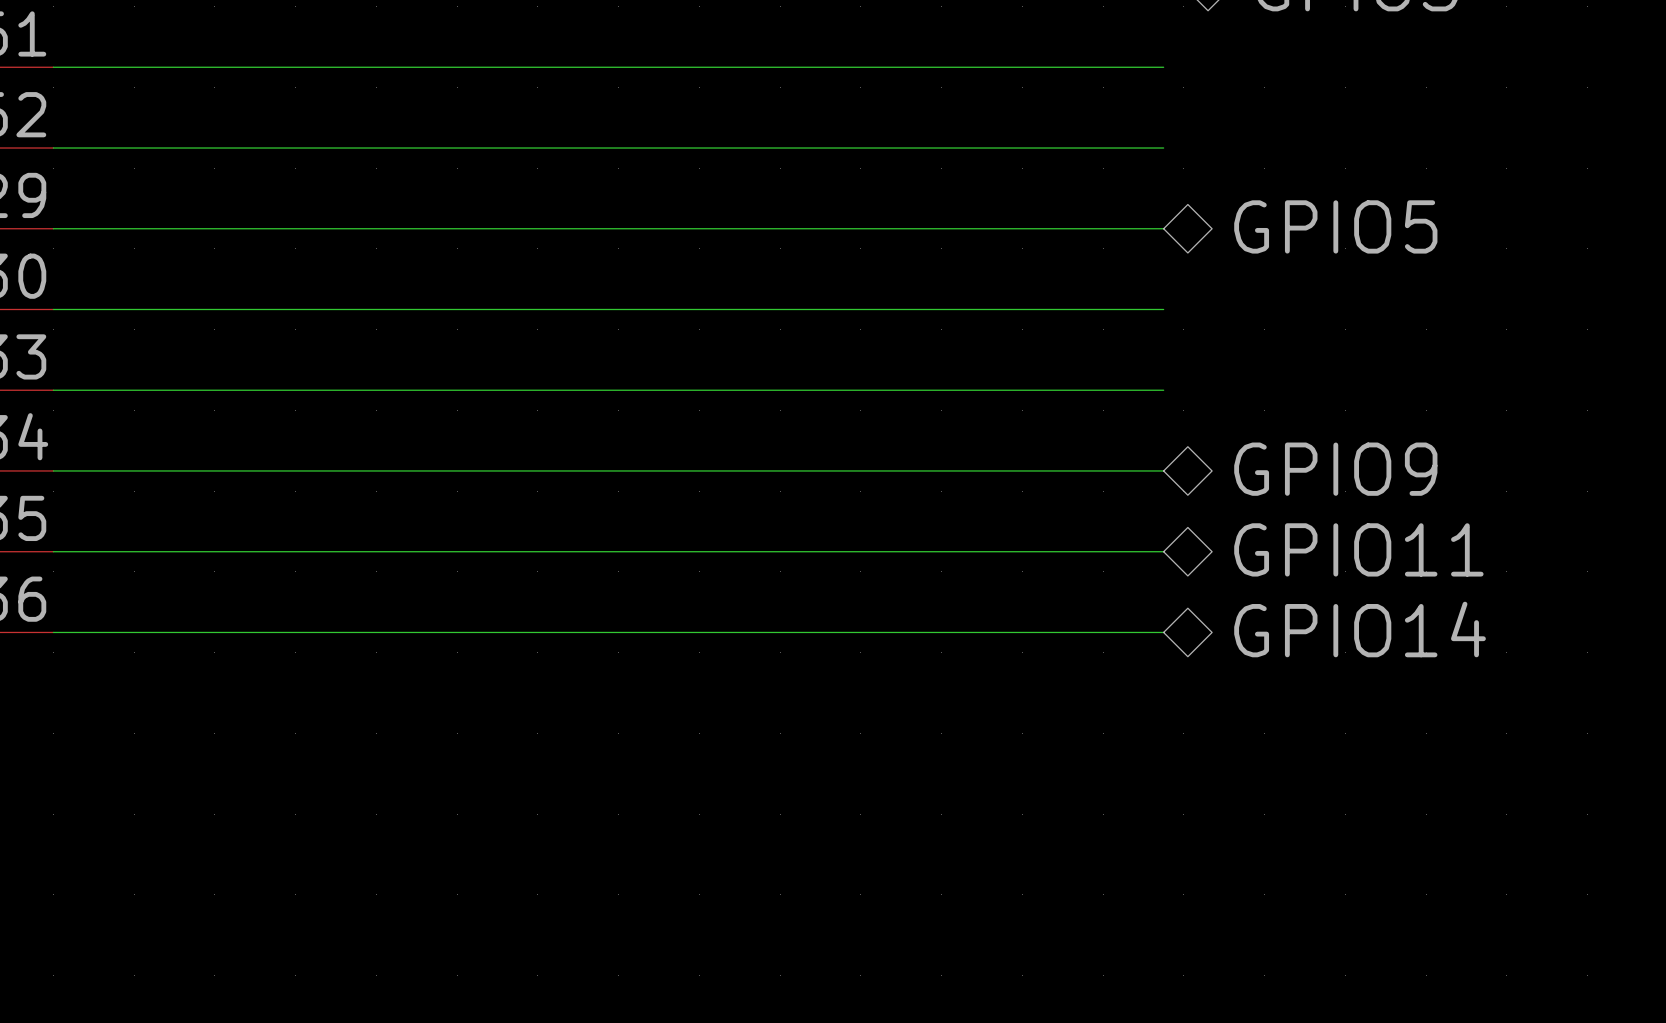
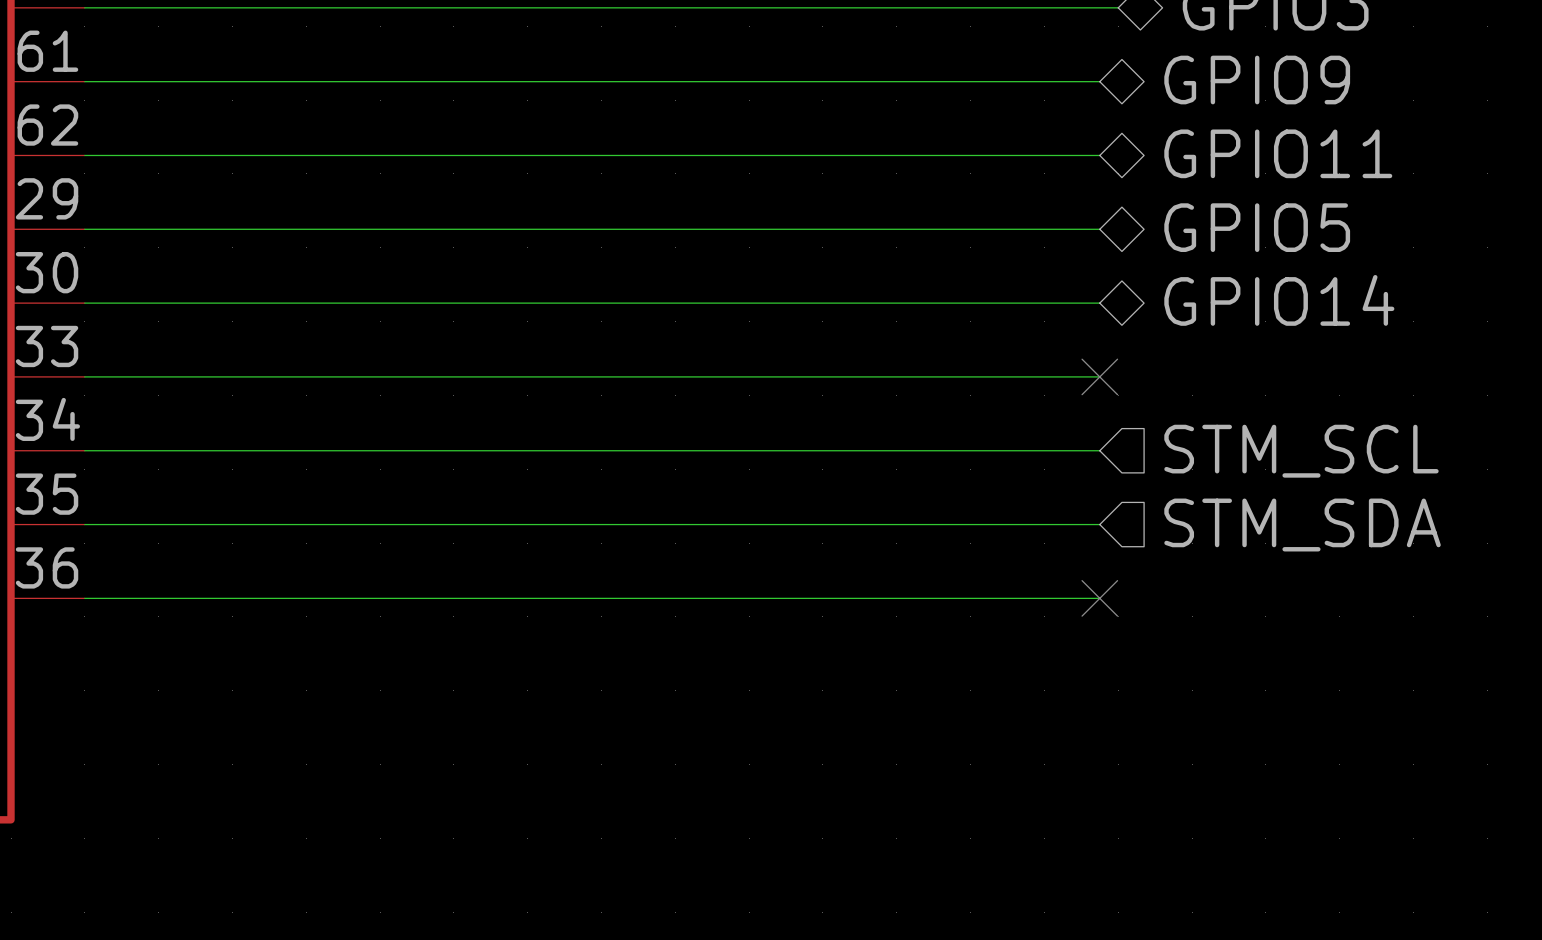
hierarchical label: none -> GPIO9 (1257, 80)
hierarchical label: none -> GPIO11 (1278, 153)
no-connect mark: none -> (1099, 376)
hierarchical label shape: bidirectional (1335, 469) -> input (1301, 451)
hierarchical label: GPIO9 (1335, 469) -> STM_SCL (1301, 451)
hierarchical label shape: bidirectional (1358, 549) -> input (1302, 525)
hierarchical label: GPIO11 (1358, 549) -> STM_SDA (1302, 525)
hierarchical label position: GPIO14 (1360, 629) -> GPIO14 (1279, 300)
no-connect mark: none -> (1099, 598)

